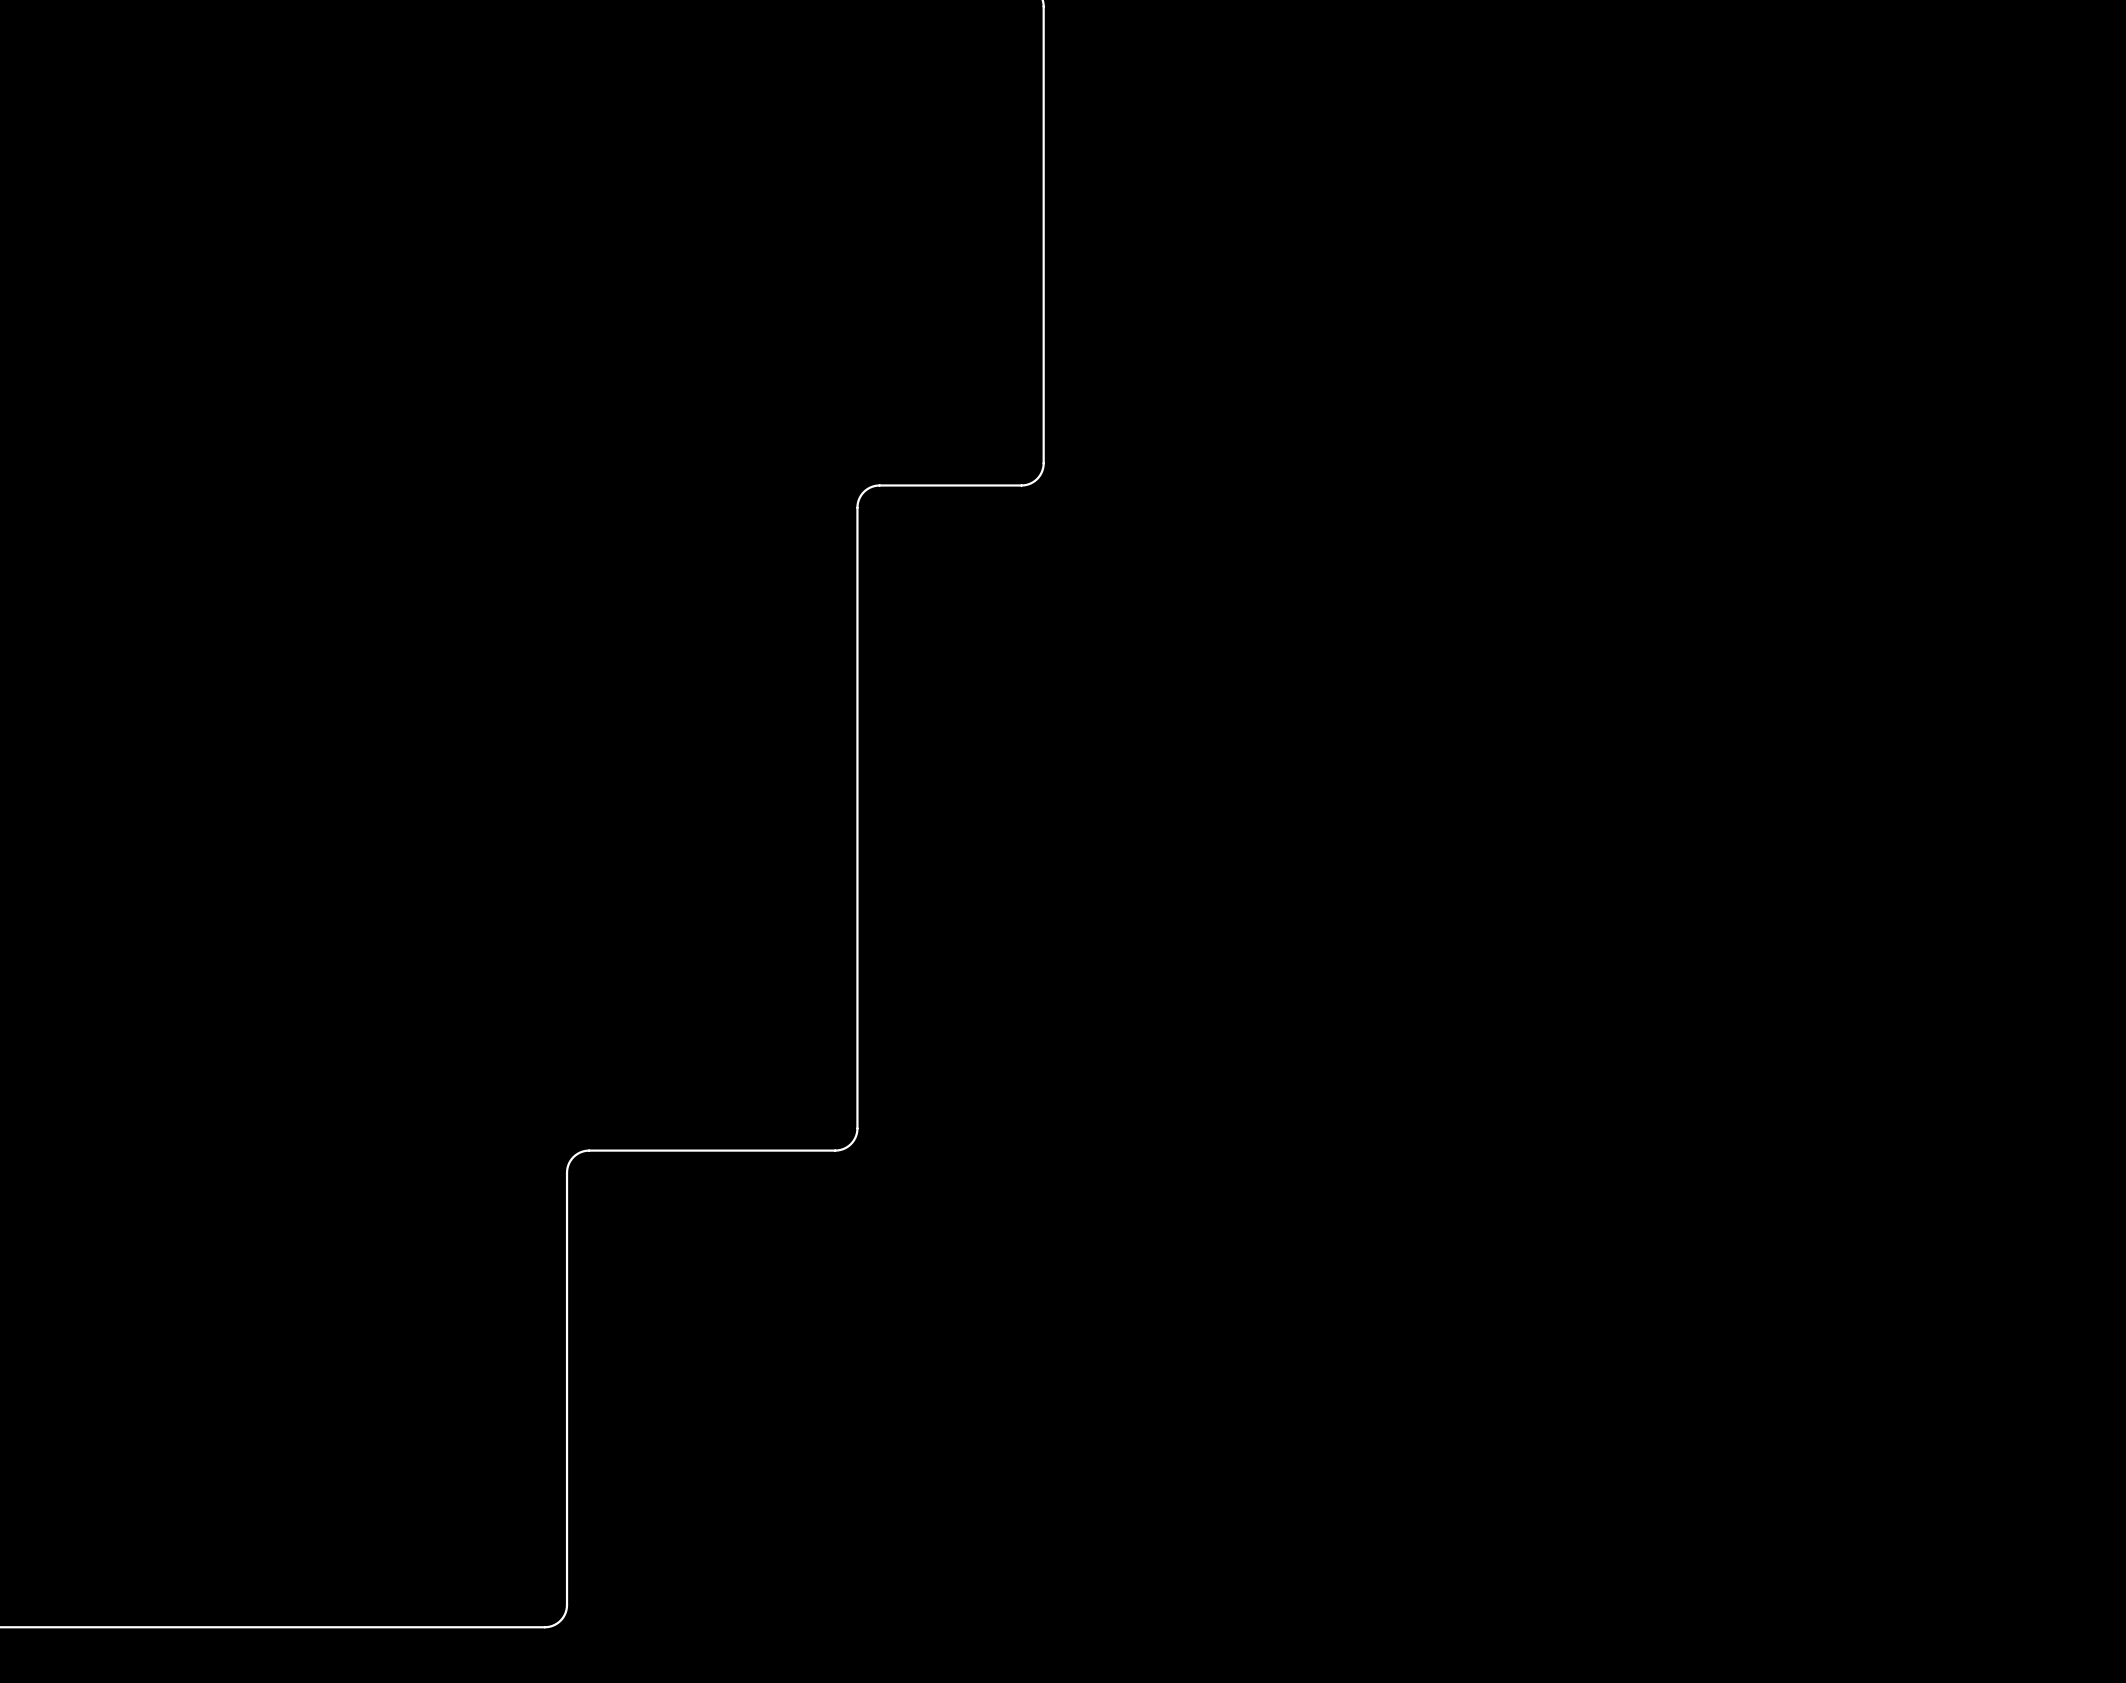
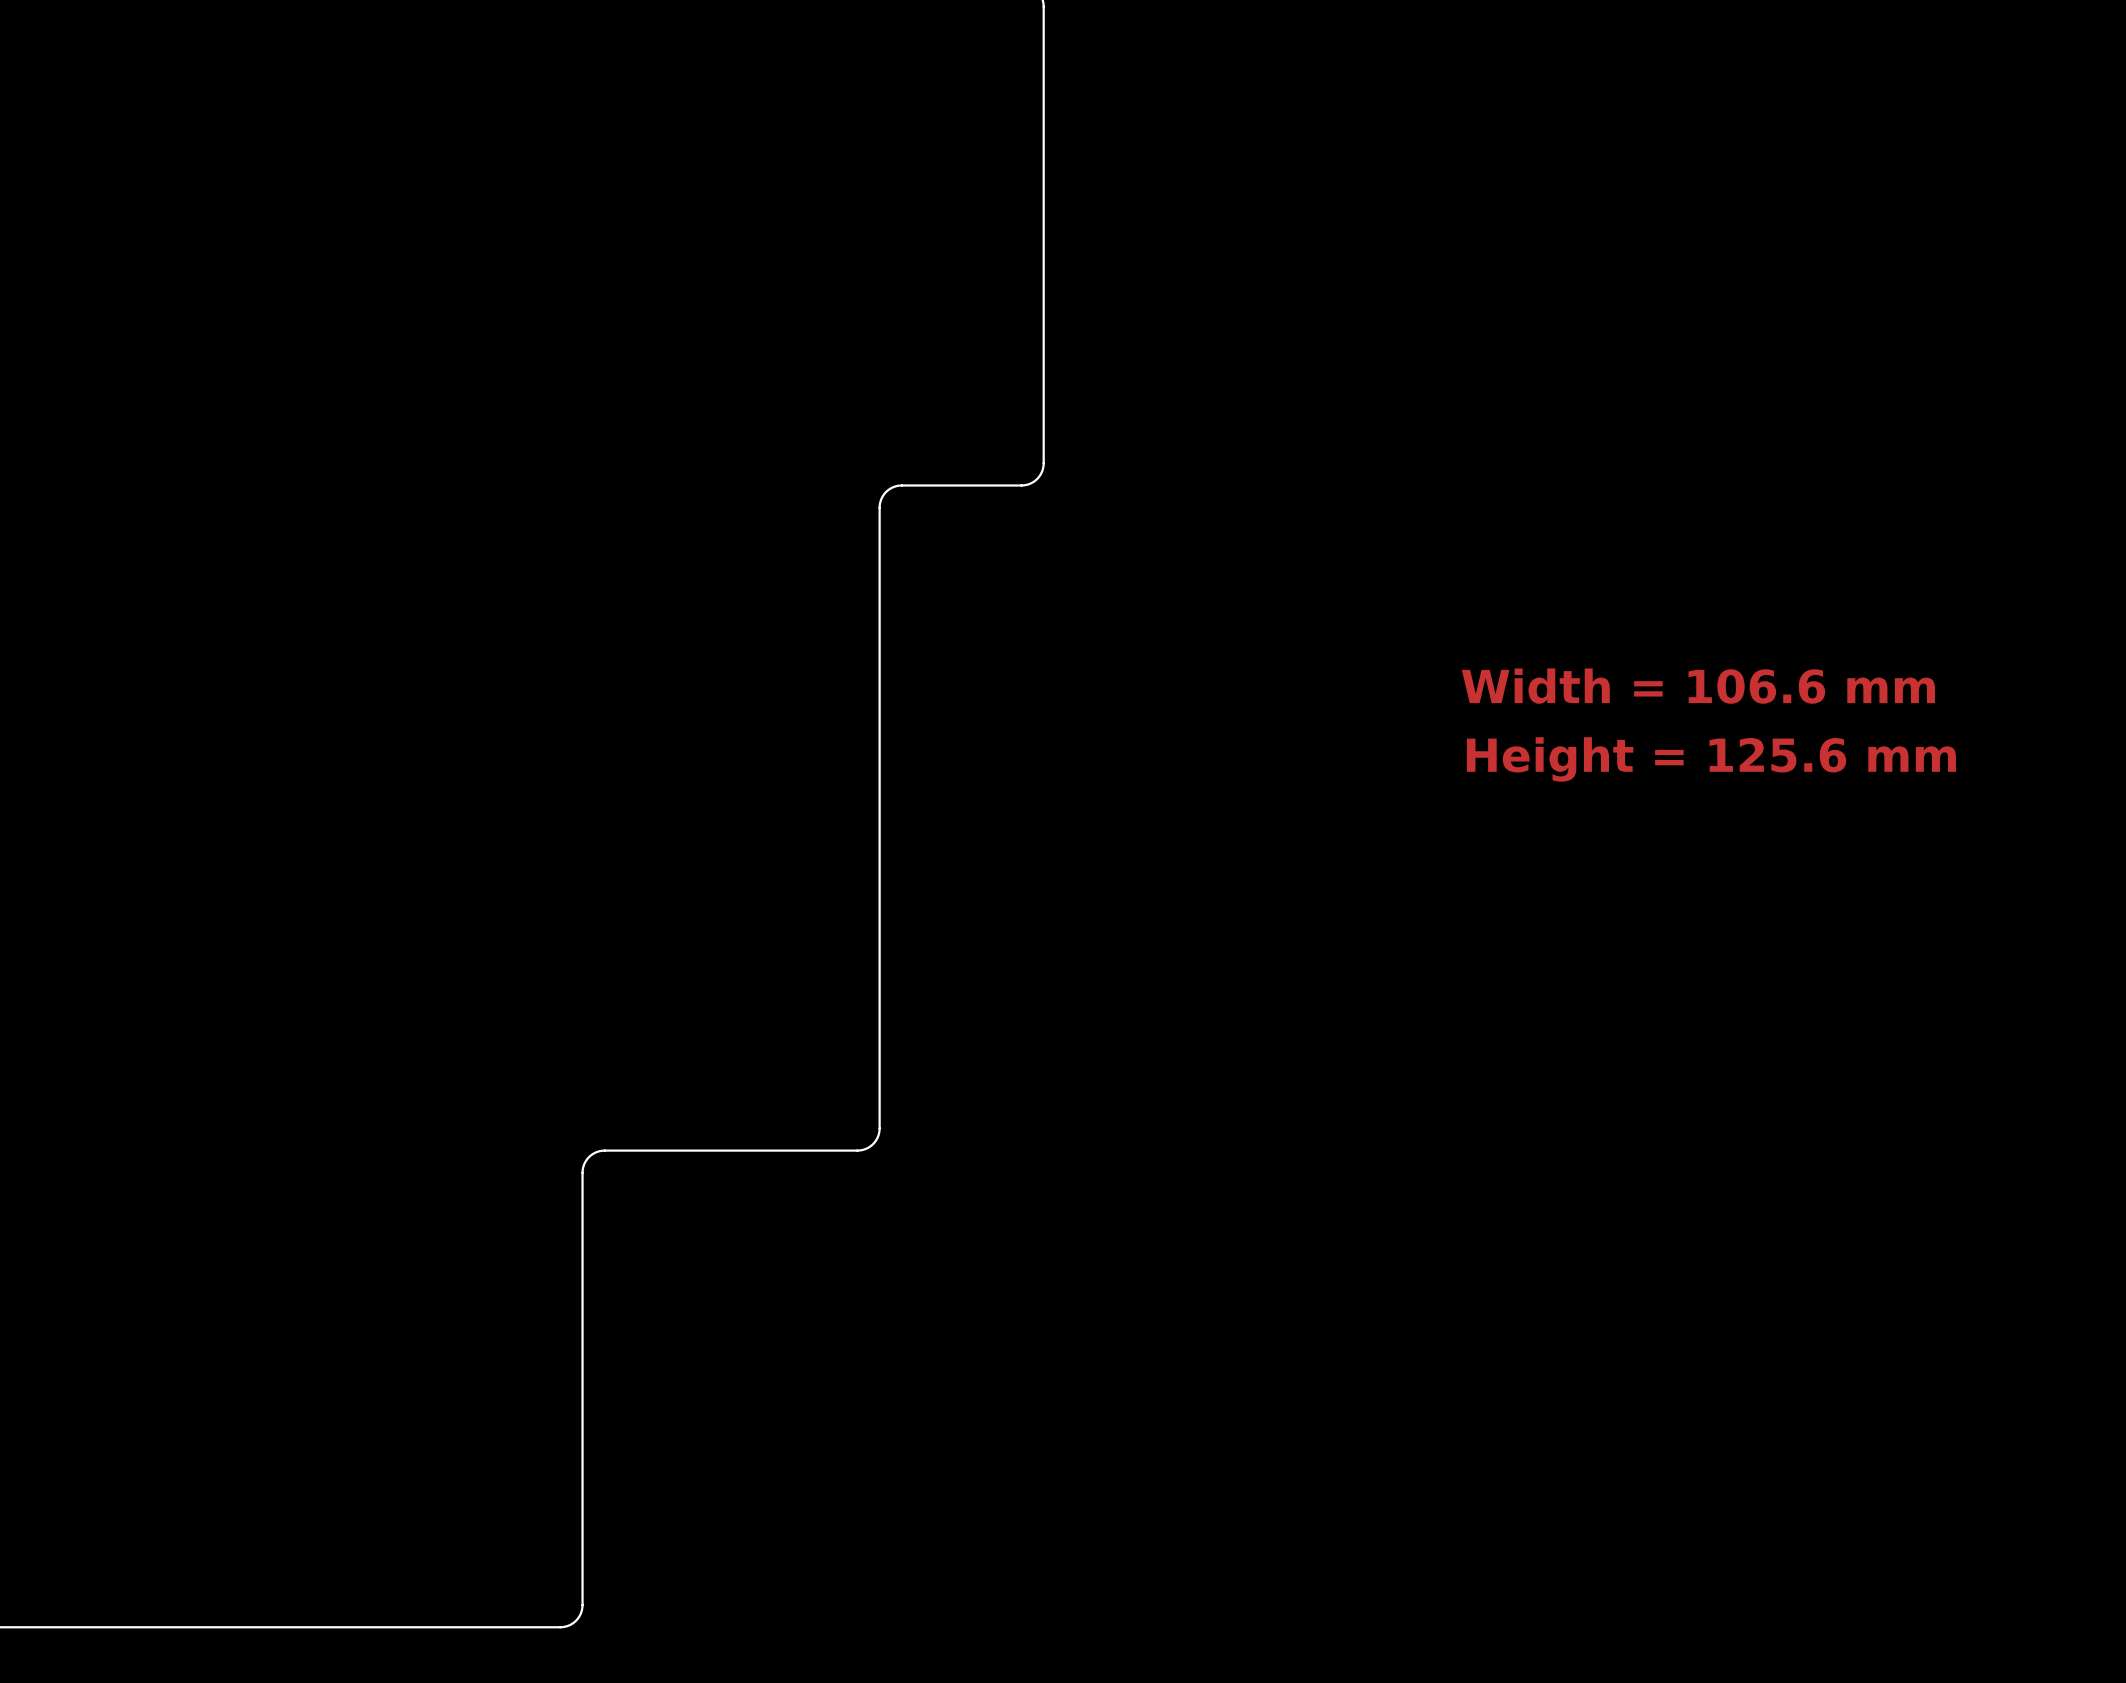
board edge: (901, 485) (877, 485) (870, 487) (860, 495) (857, 505) (857, 1128) (855, 1138) (850, 1144) (844, 1148) (835, 1150) -> (901, 485) (894, 486) (886, 491) (880, 500) (879, 507) (879, 1130) (874, 1142) (867, 1148) (859, 1150) (835, 1150)
text: none -> Width = 106.6 mm (1698, 686)
text: none -> Height = 125.6 mm (1711, 759)
board edge: (604, 1150) (579, 1152) (570, 1160) (567, 1170) (567, 1605) (564, 1614) (560, 1620) (554, 1625) (544, 1627) -> (604, 1150) (595, 1152) (589, 1157) (583, 1165) (582, 1172) (582, 1607) (577, 1618) (569, 1625) (544, 1627)

